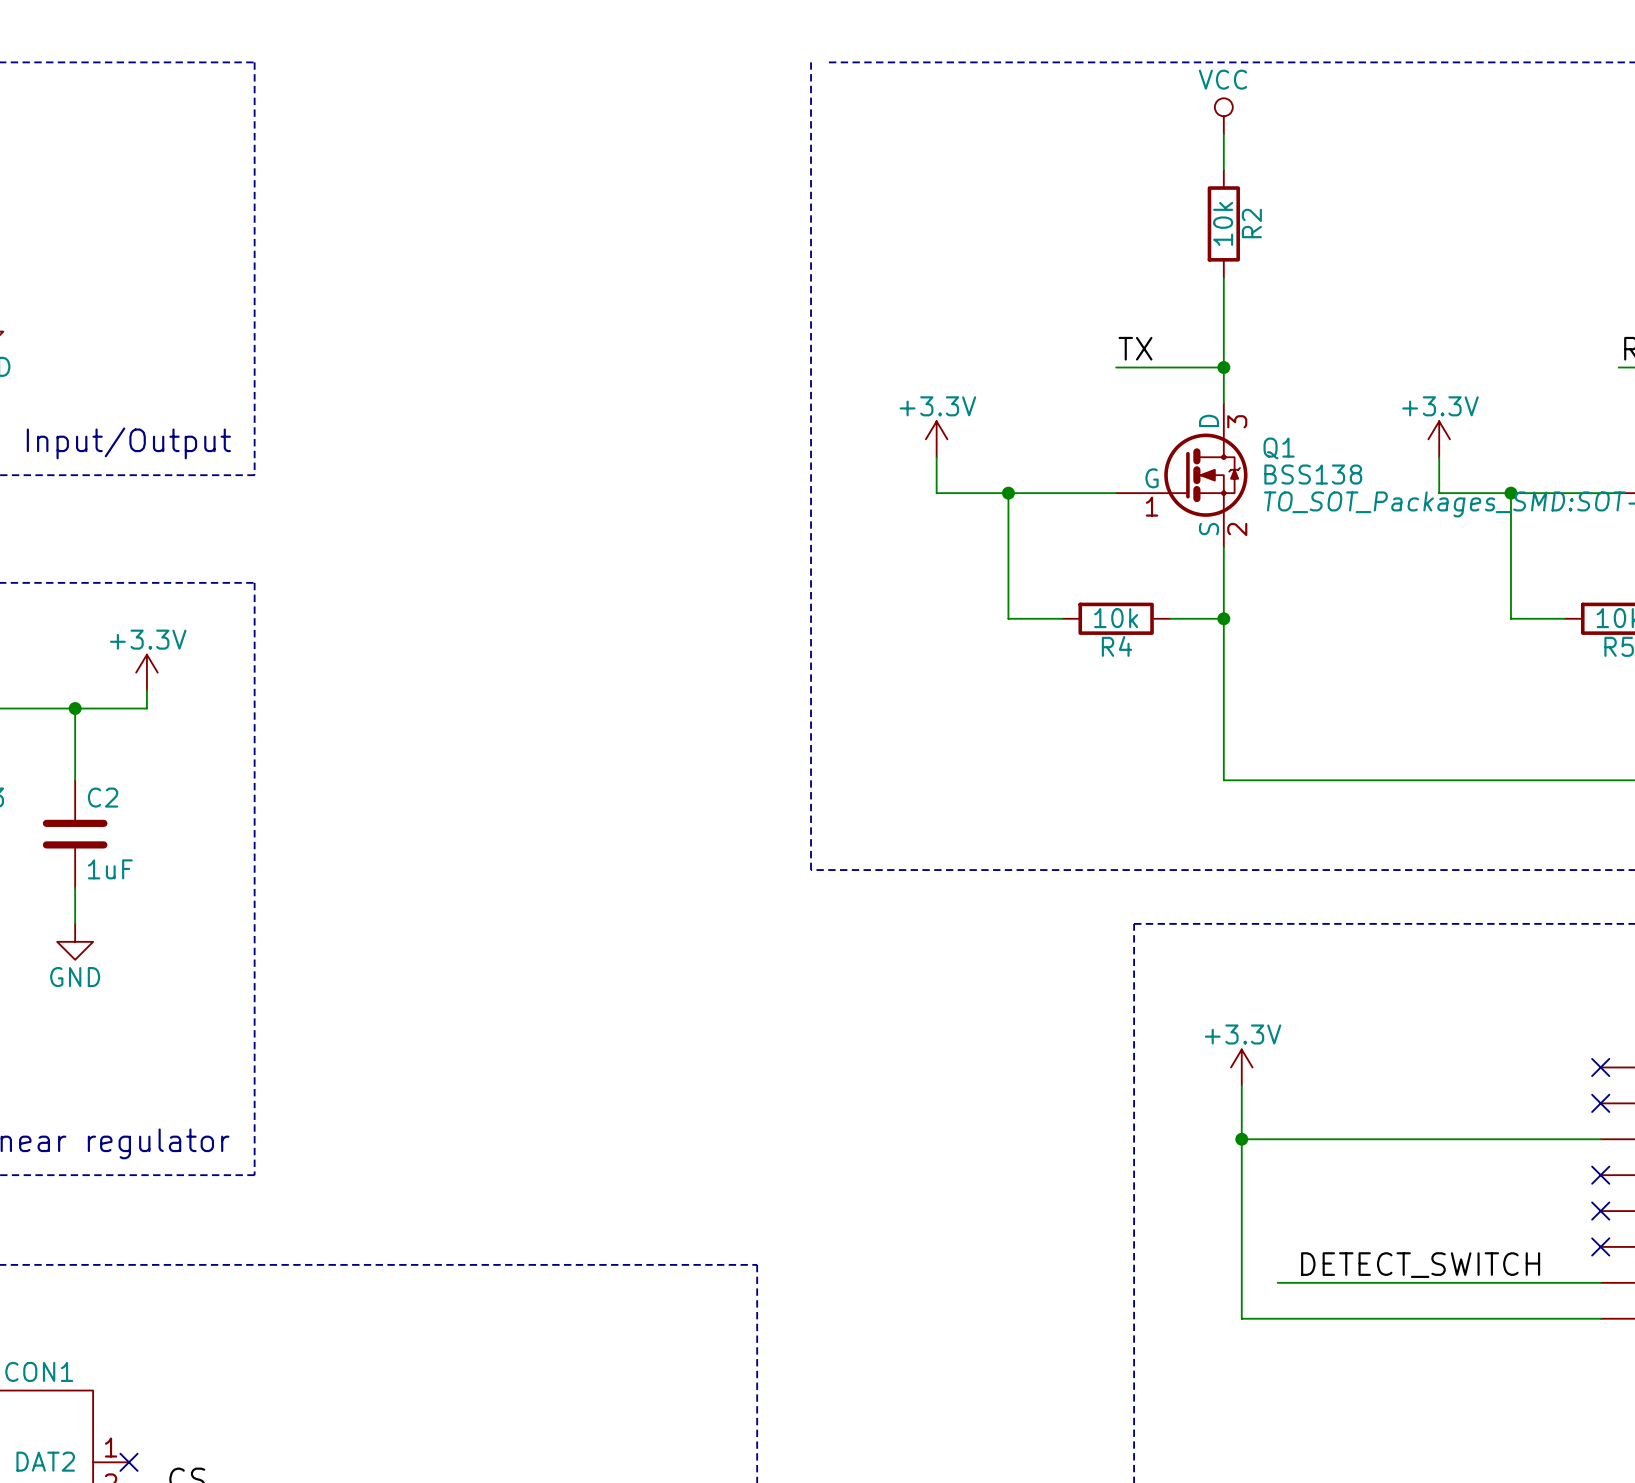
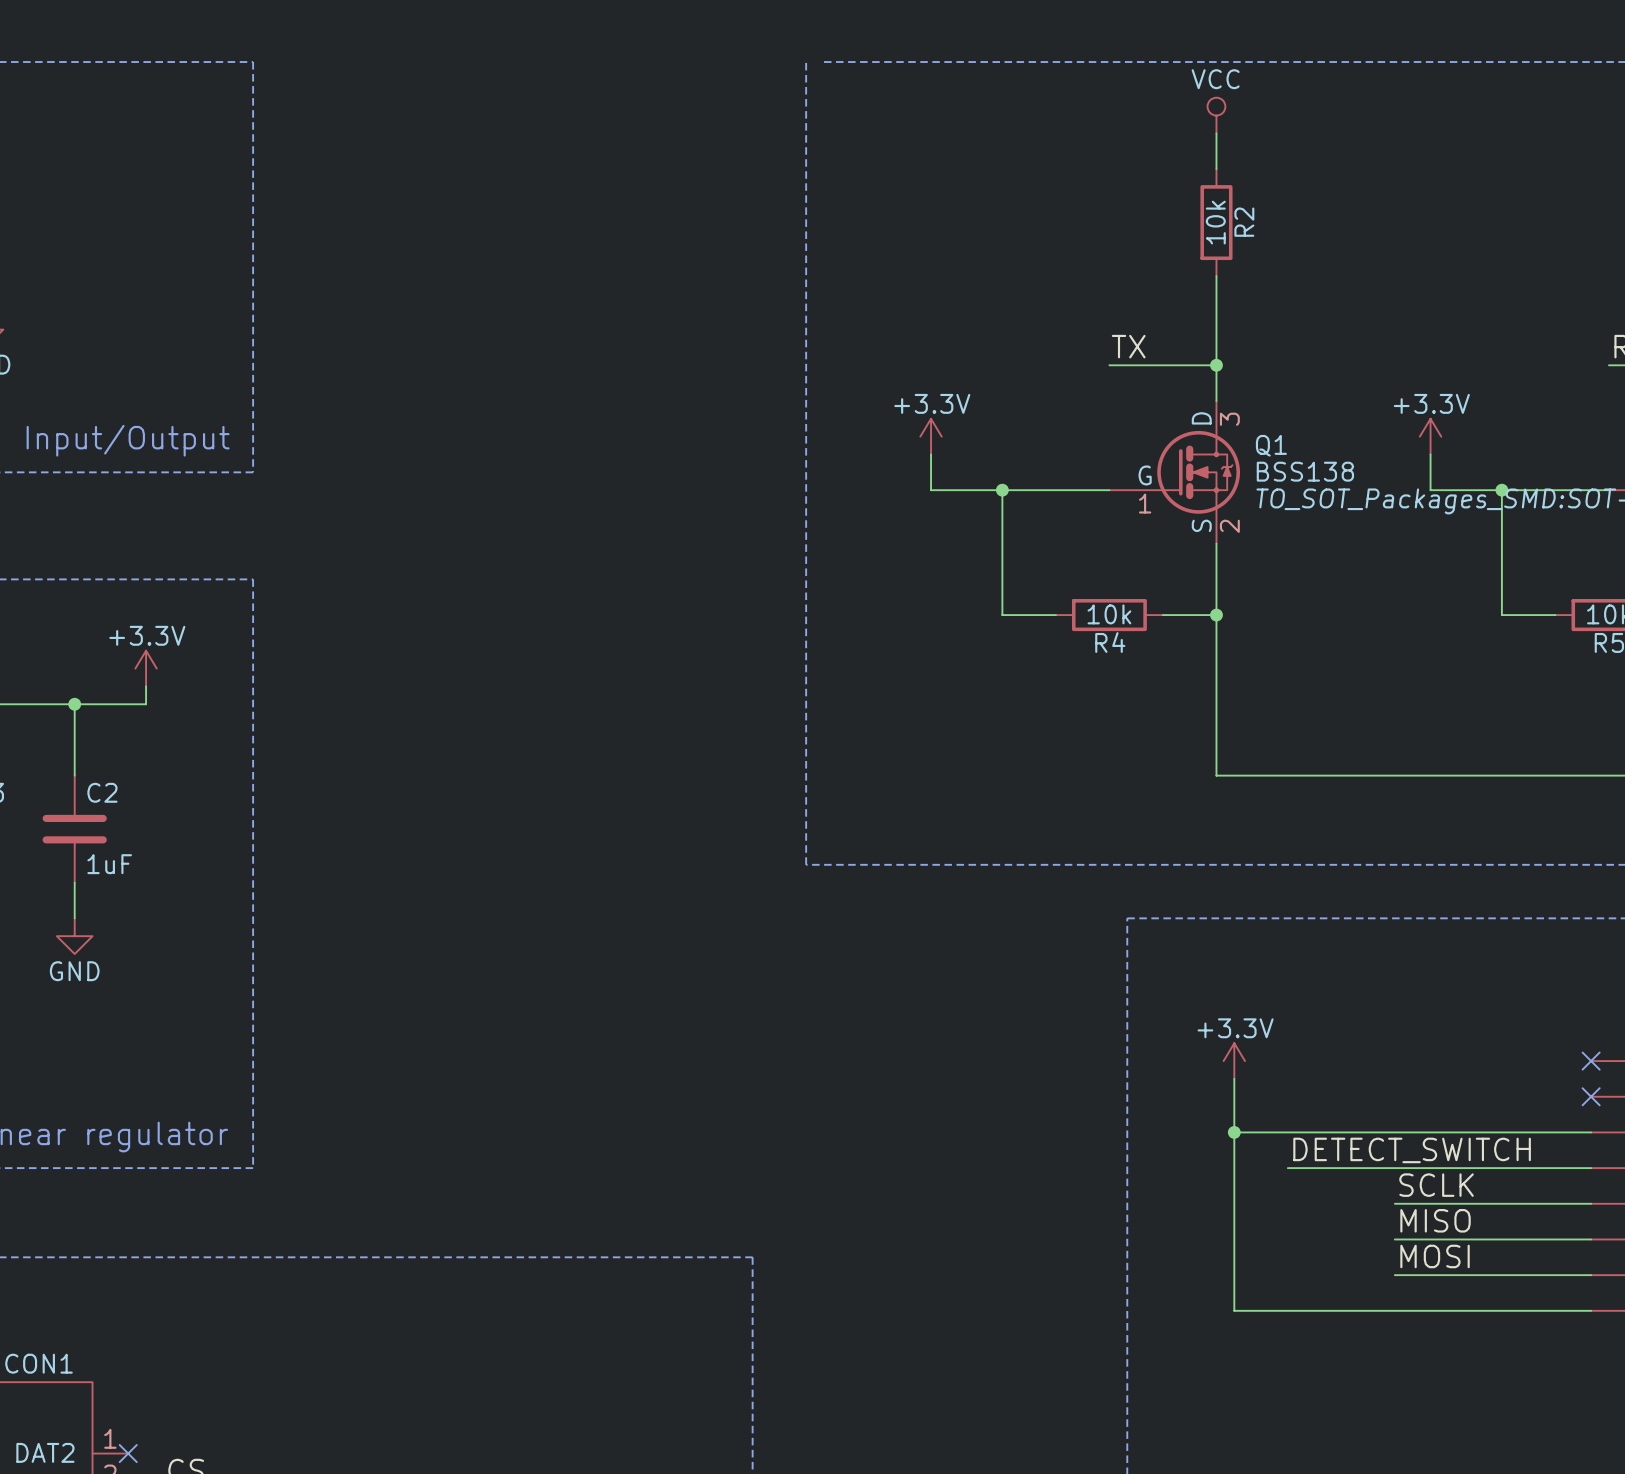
wire: none -> (1287, 1168) (1591, 1168)
no-connect mark: (1600, 1175) -> none
label: none -> SCLK (1436, 1185)
wire: none -> (1394, 1203) (1591, 1203)
no-connect mark: (1600, 1211) -> none
label: none -> MISO (1435, 1220)
wire: none -> (1394, 1239) (1591, 1239)
no-connect mark: (1600, 1246) -> none
label: none -> MOSI (1435, 1256)
label position: DETECT_SWITCH (1420, 1265) -> DETECT_SWITCH (1412, 1150)
wire: (1277, 1282) (1403, 1282) -> none

